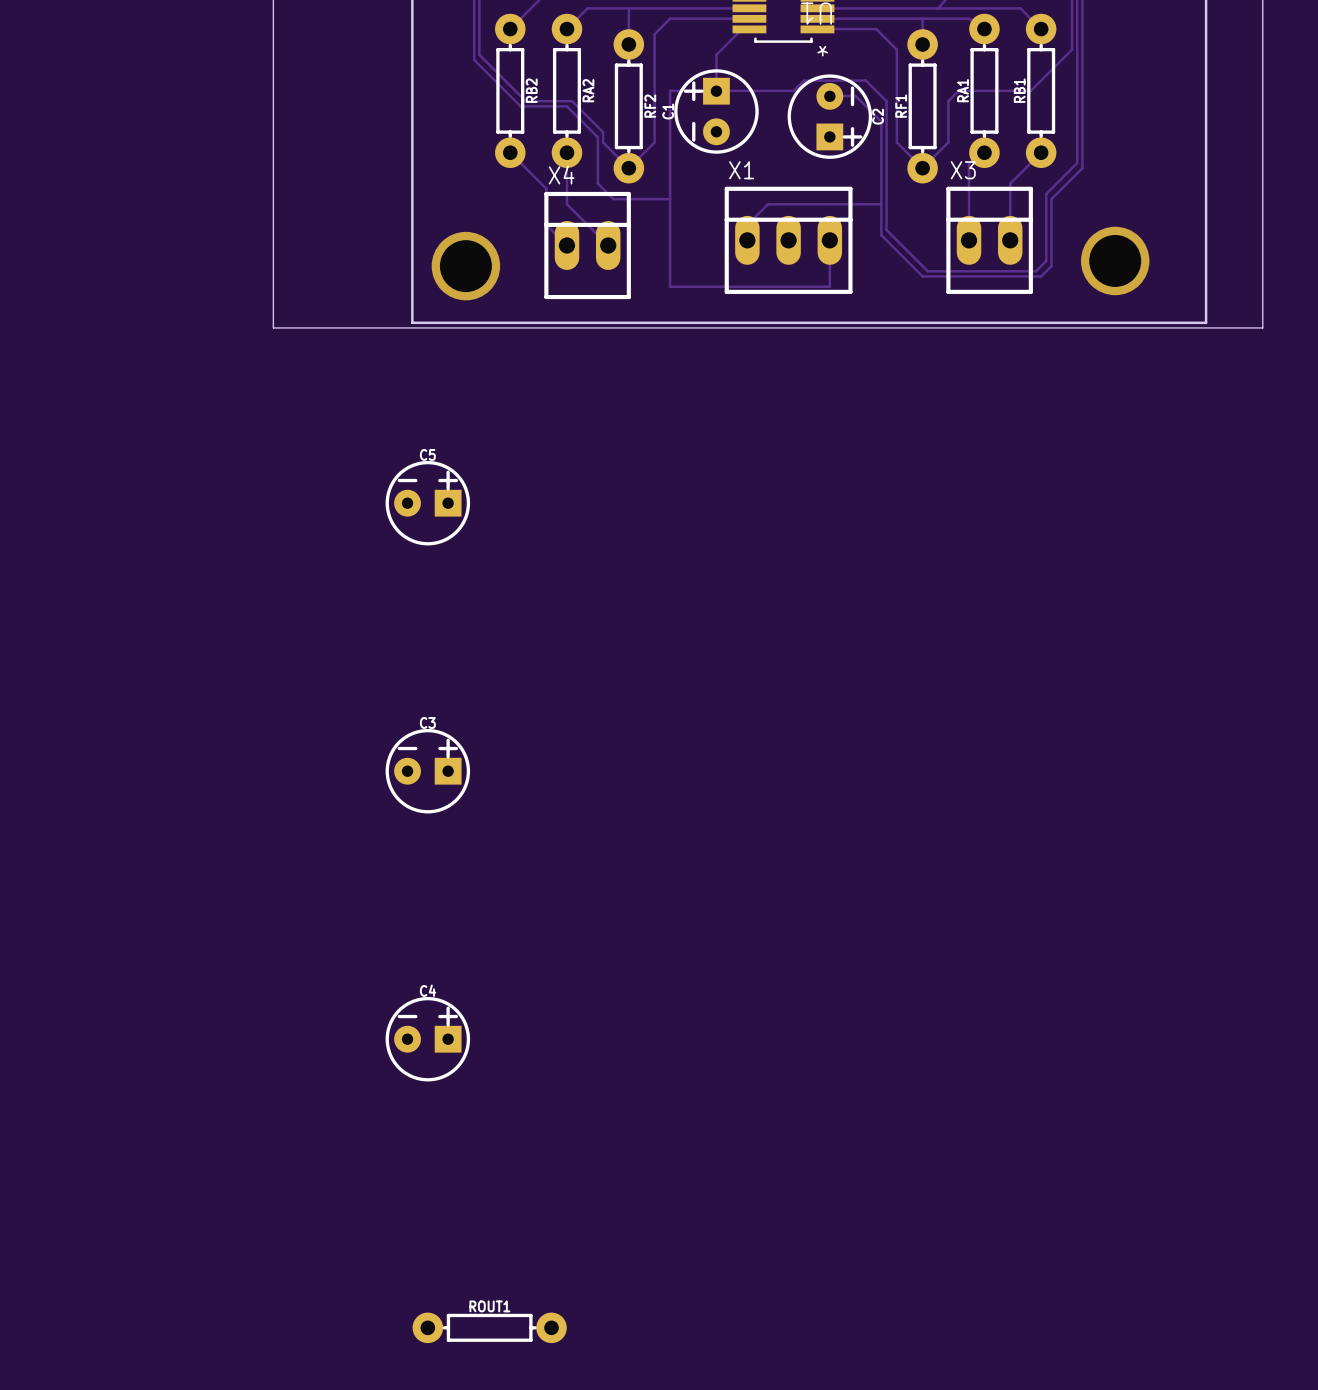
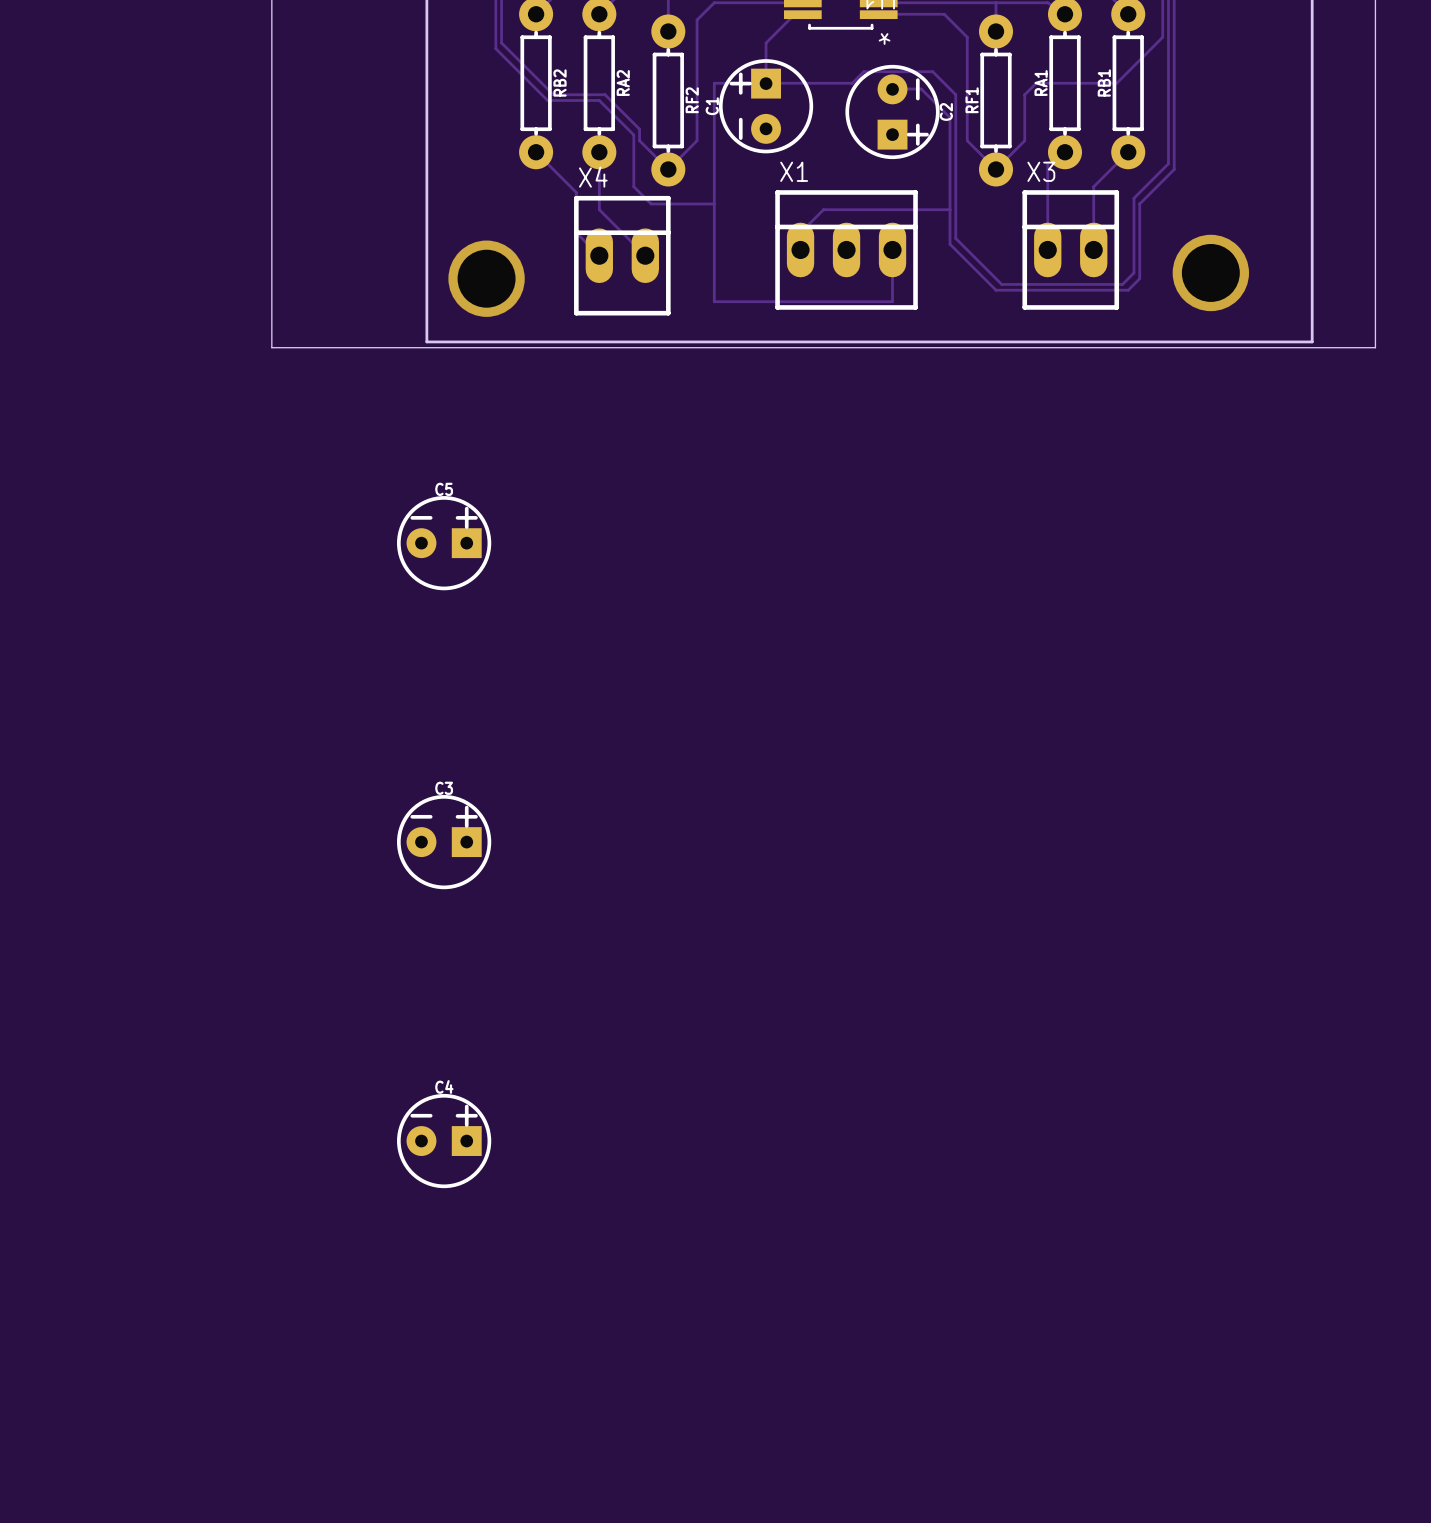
ROUT1: (489, 1327) -> none

